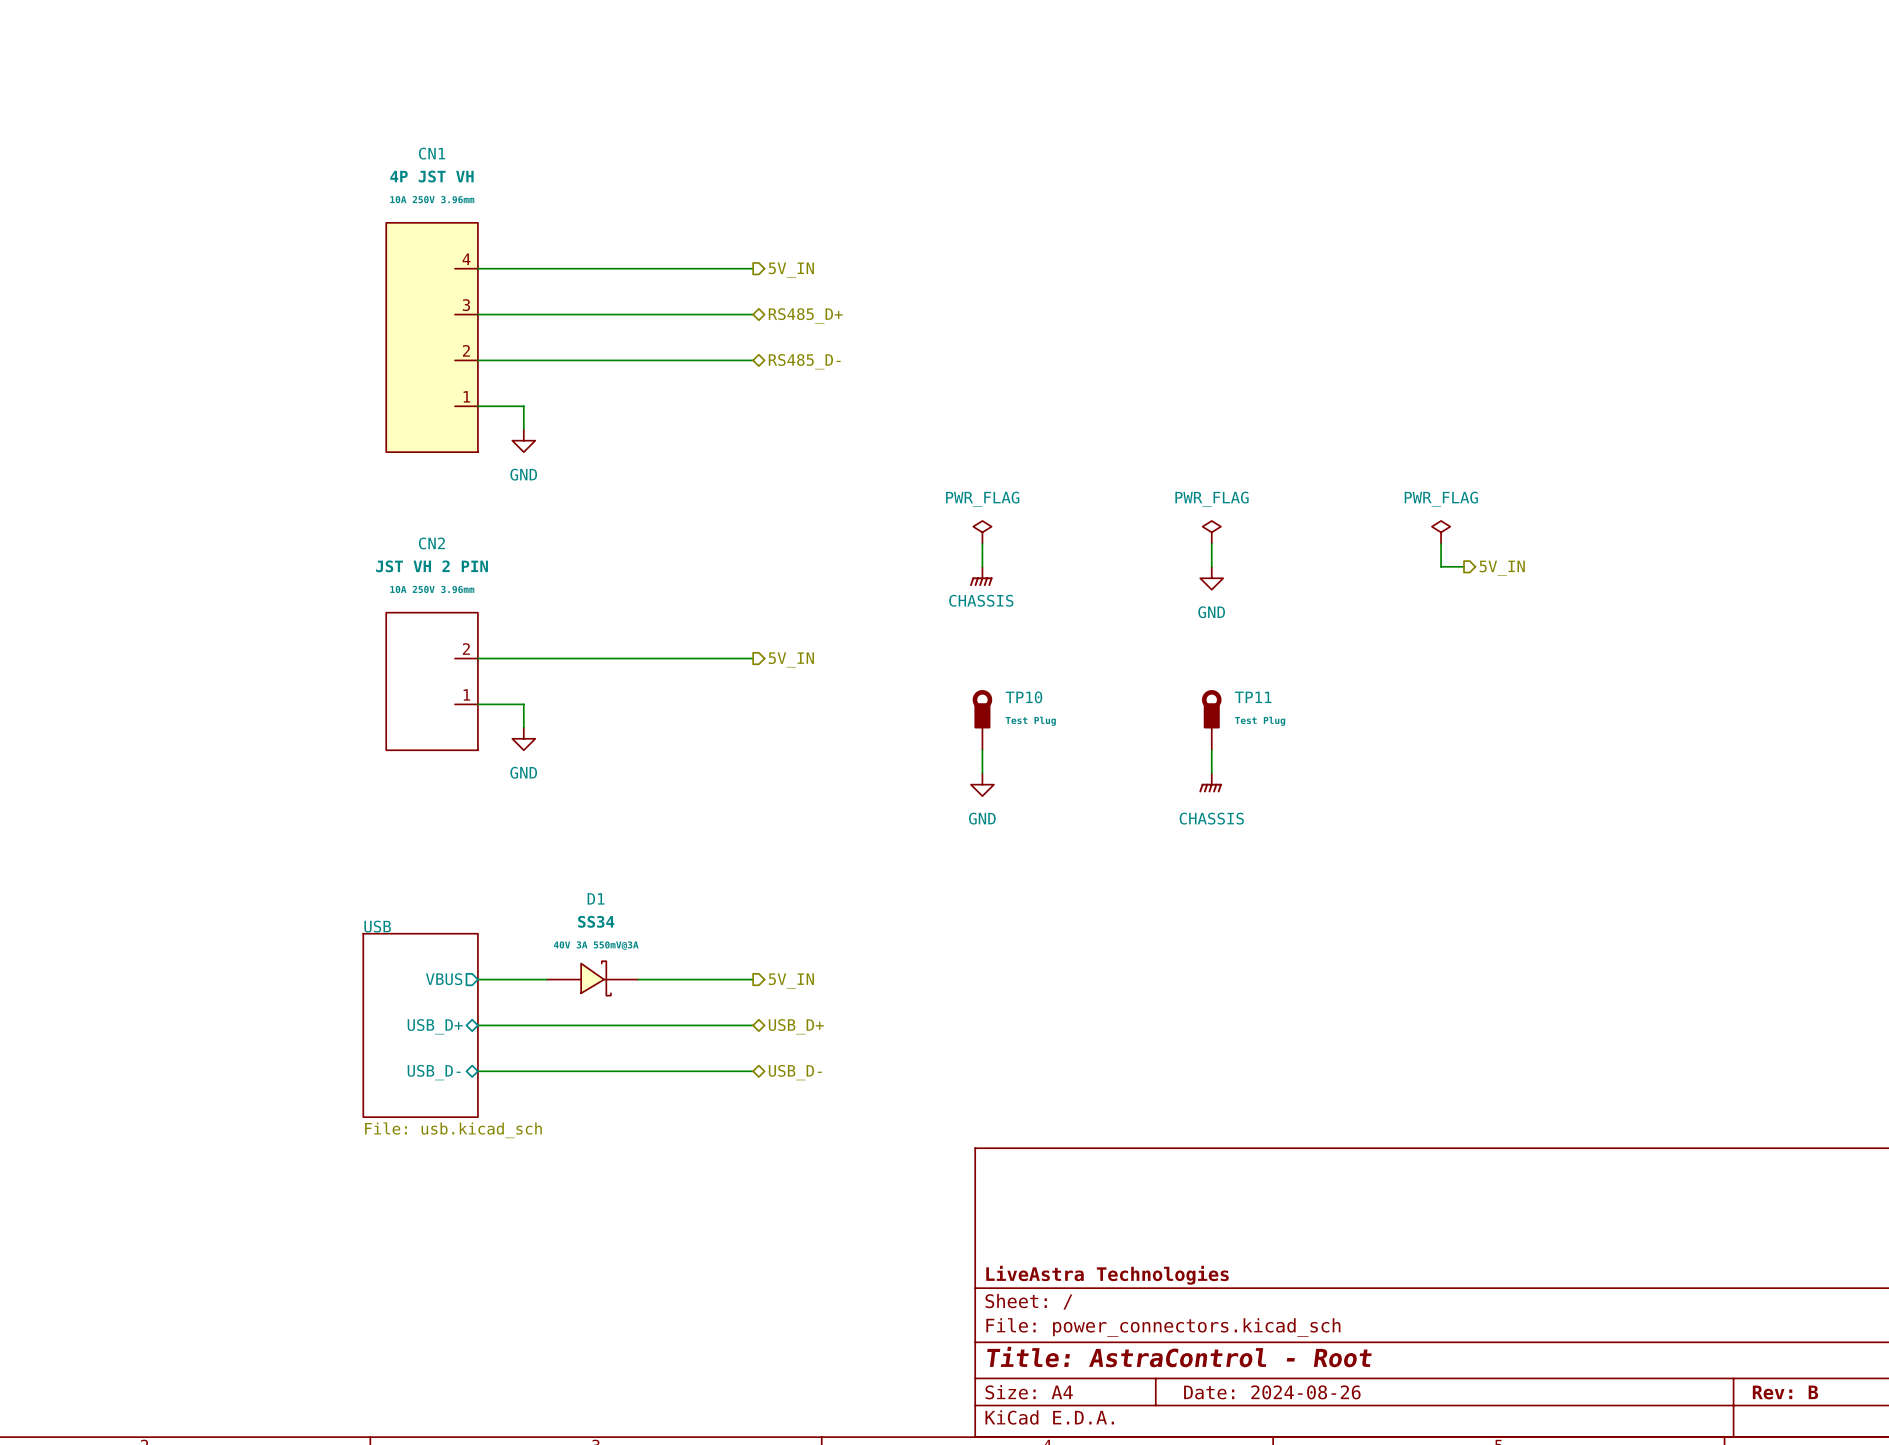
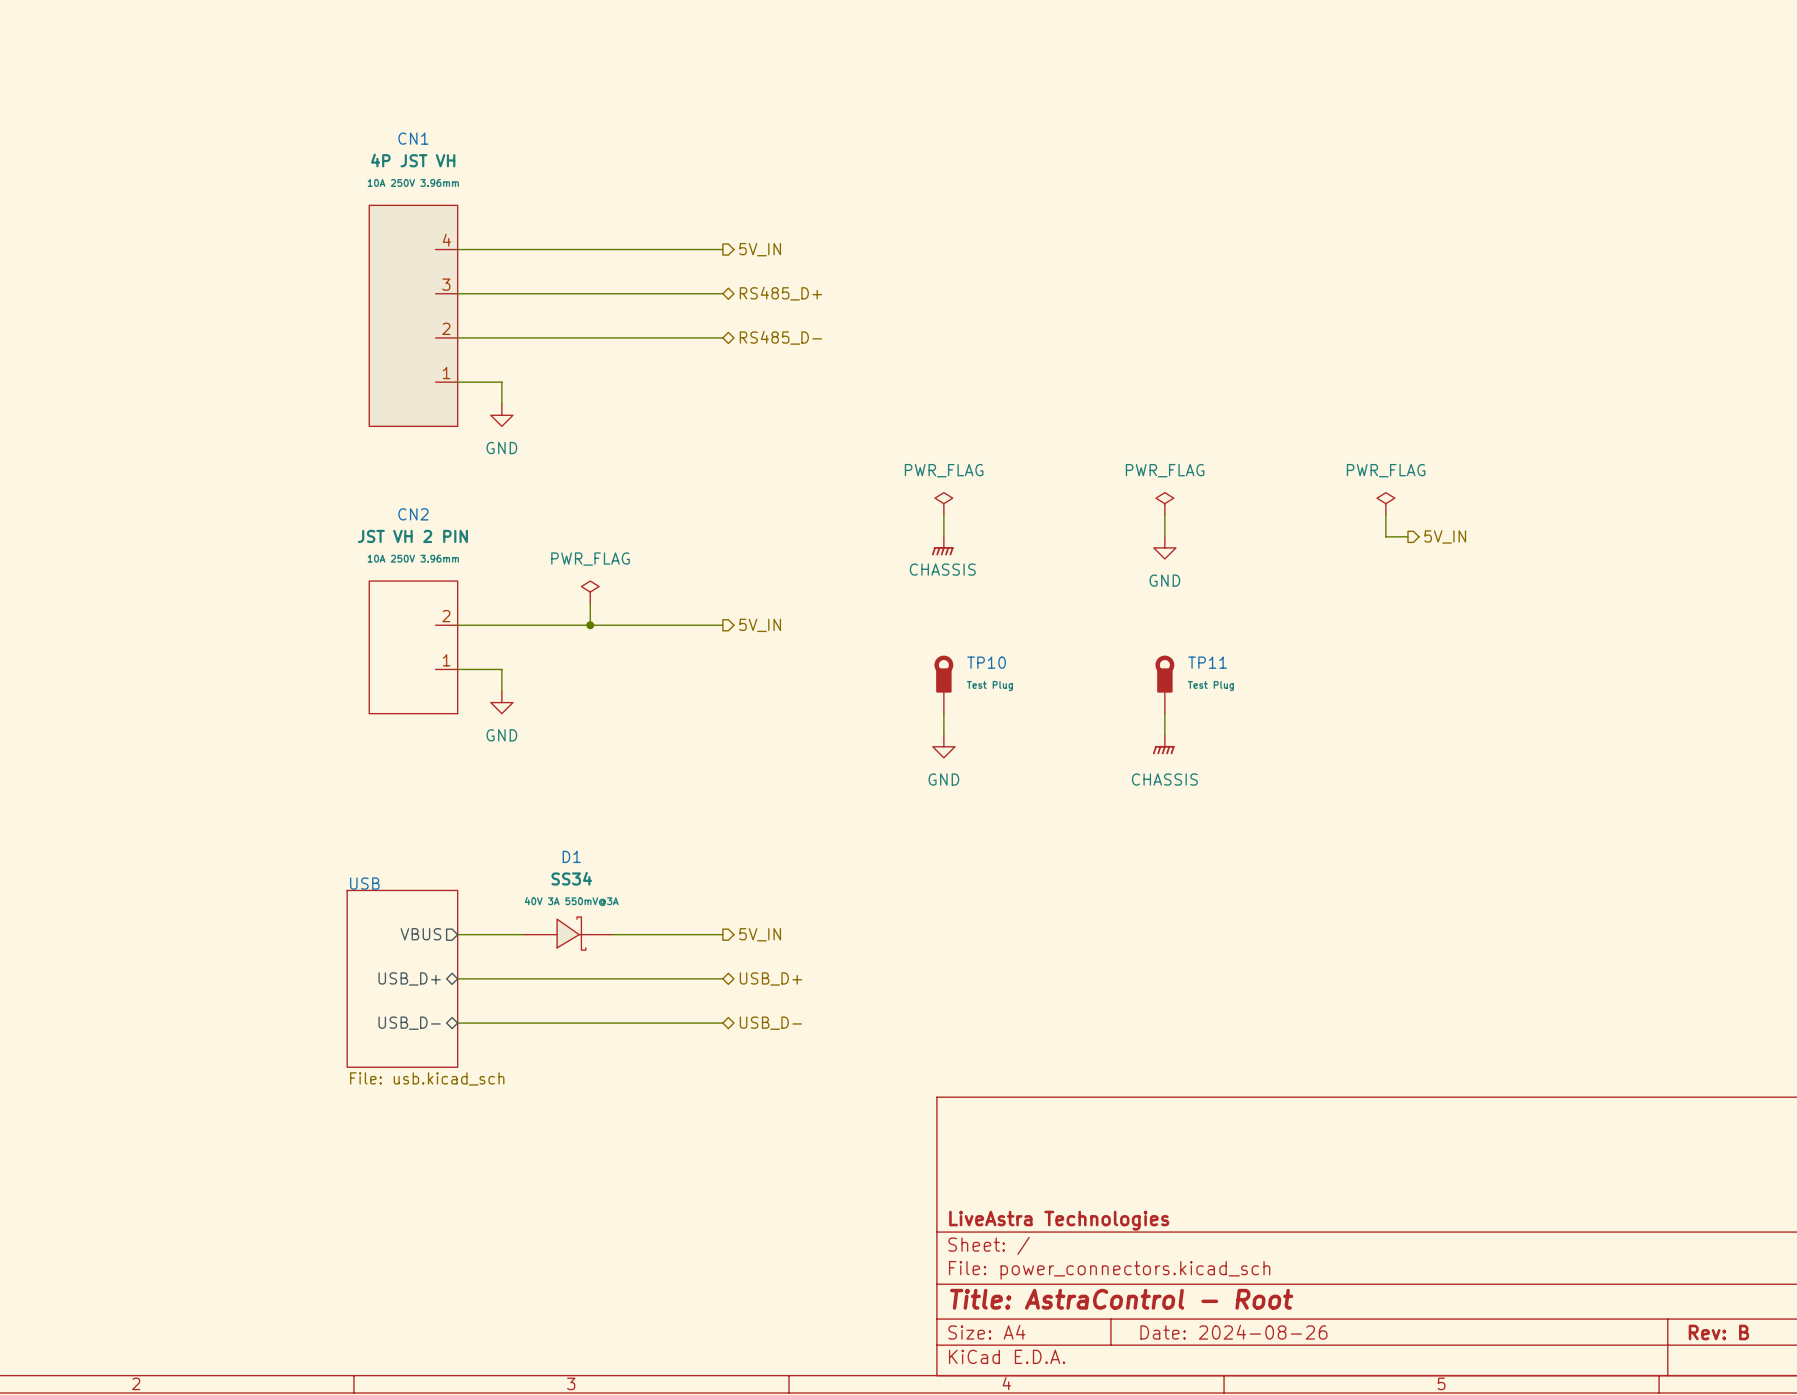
power symbol: none -> PWR_FLAG (590, 592)
wire: none -> (590, 603) (590, 625)
junction: none -> (590, 625)

